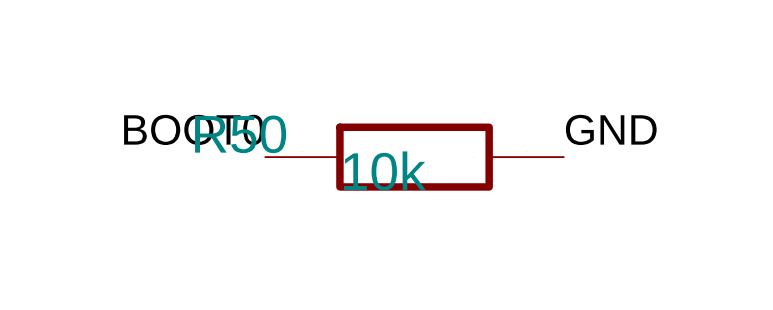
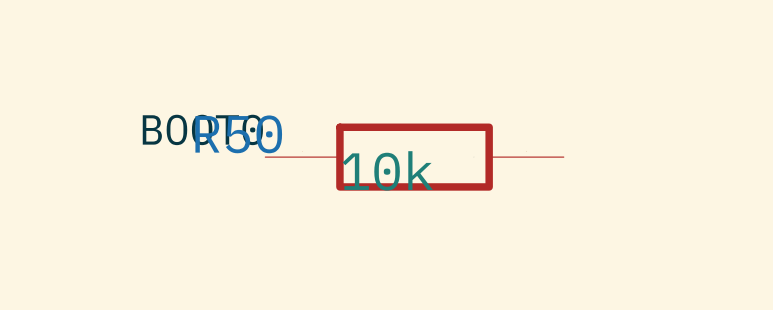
label: GND (611, 129) -> none

